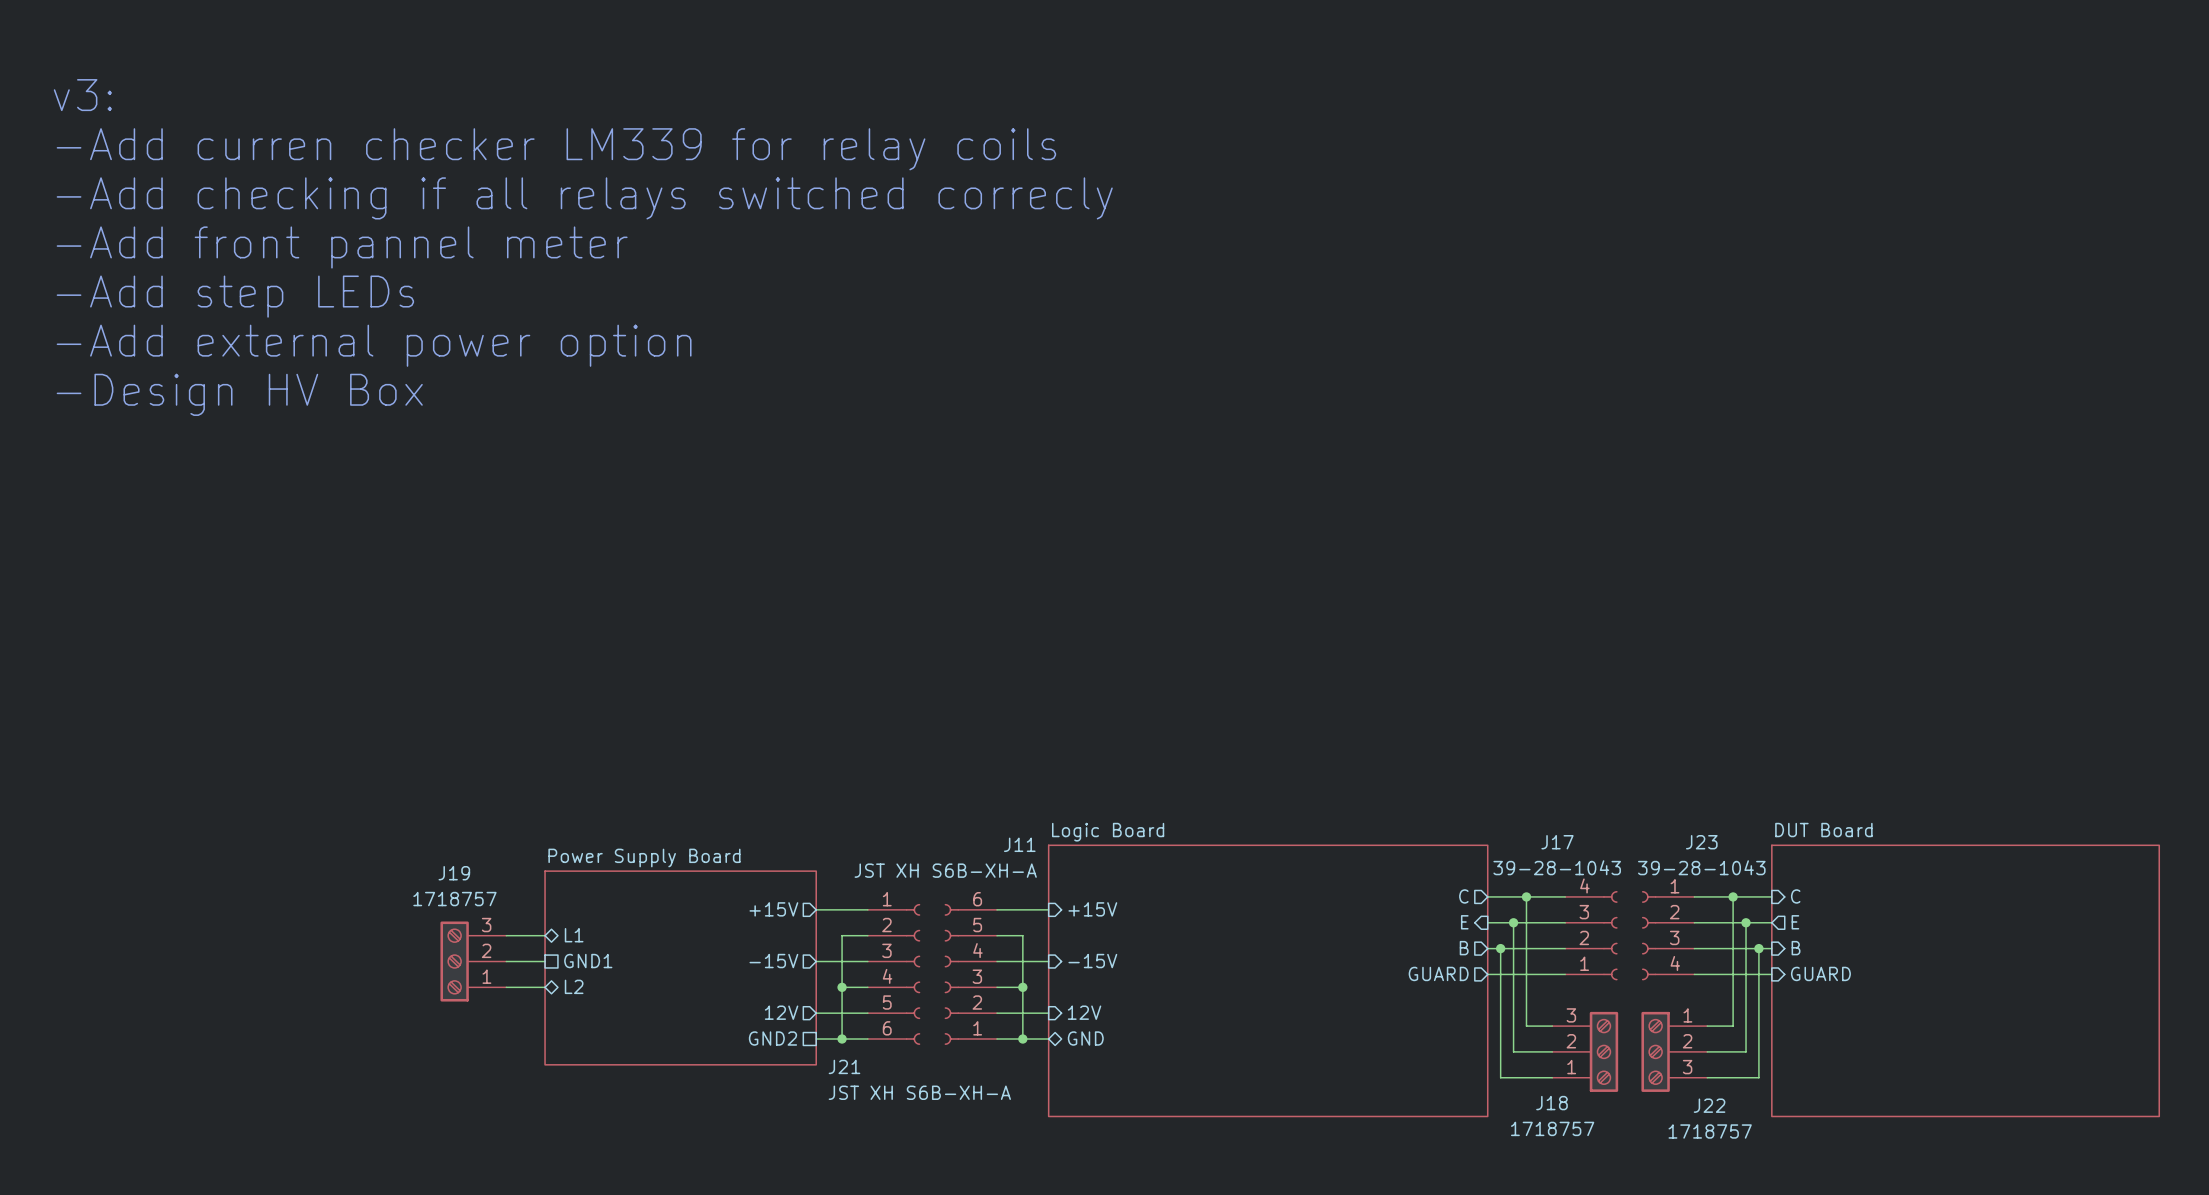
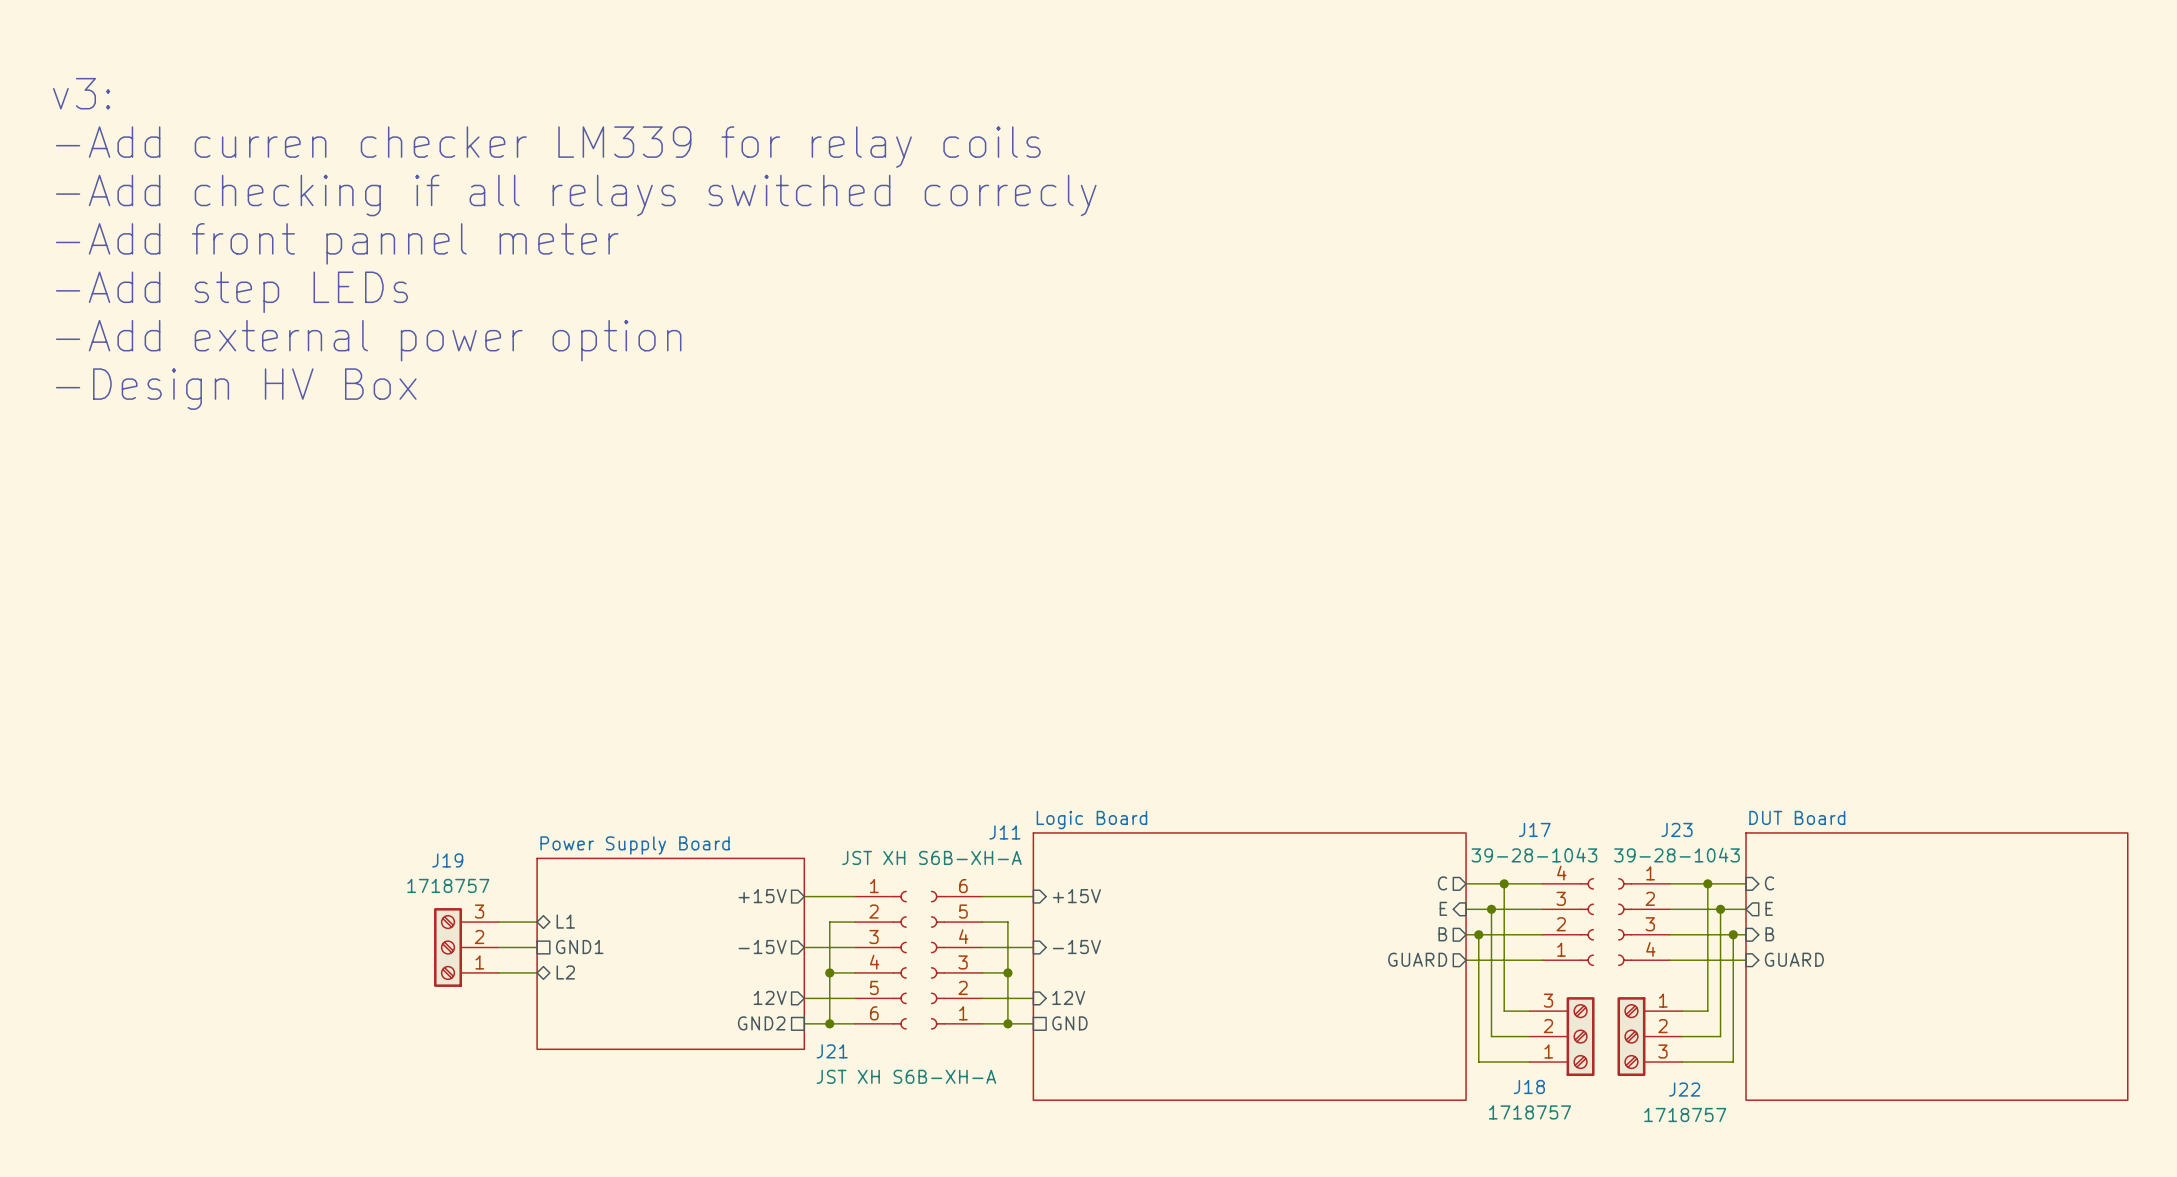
sheet pin shape: bidirectional (1085, 1038) -> passive (1069, 1023)

